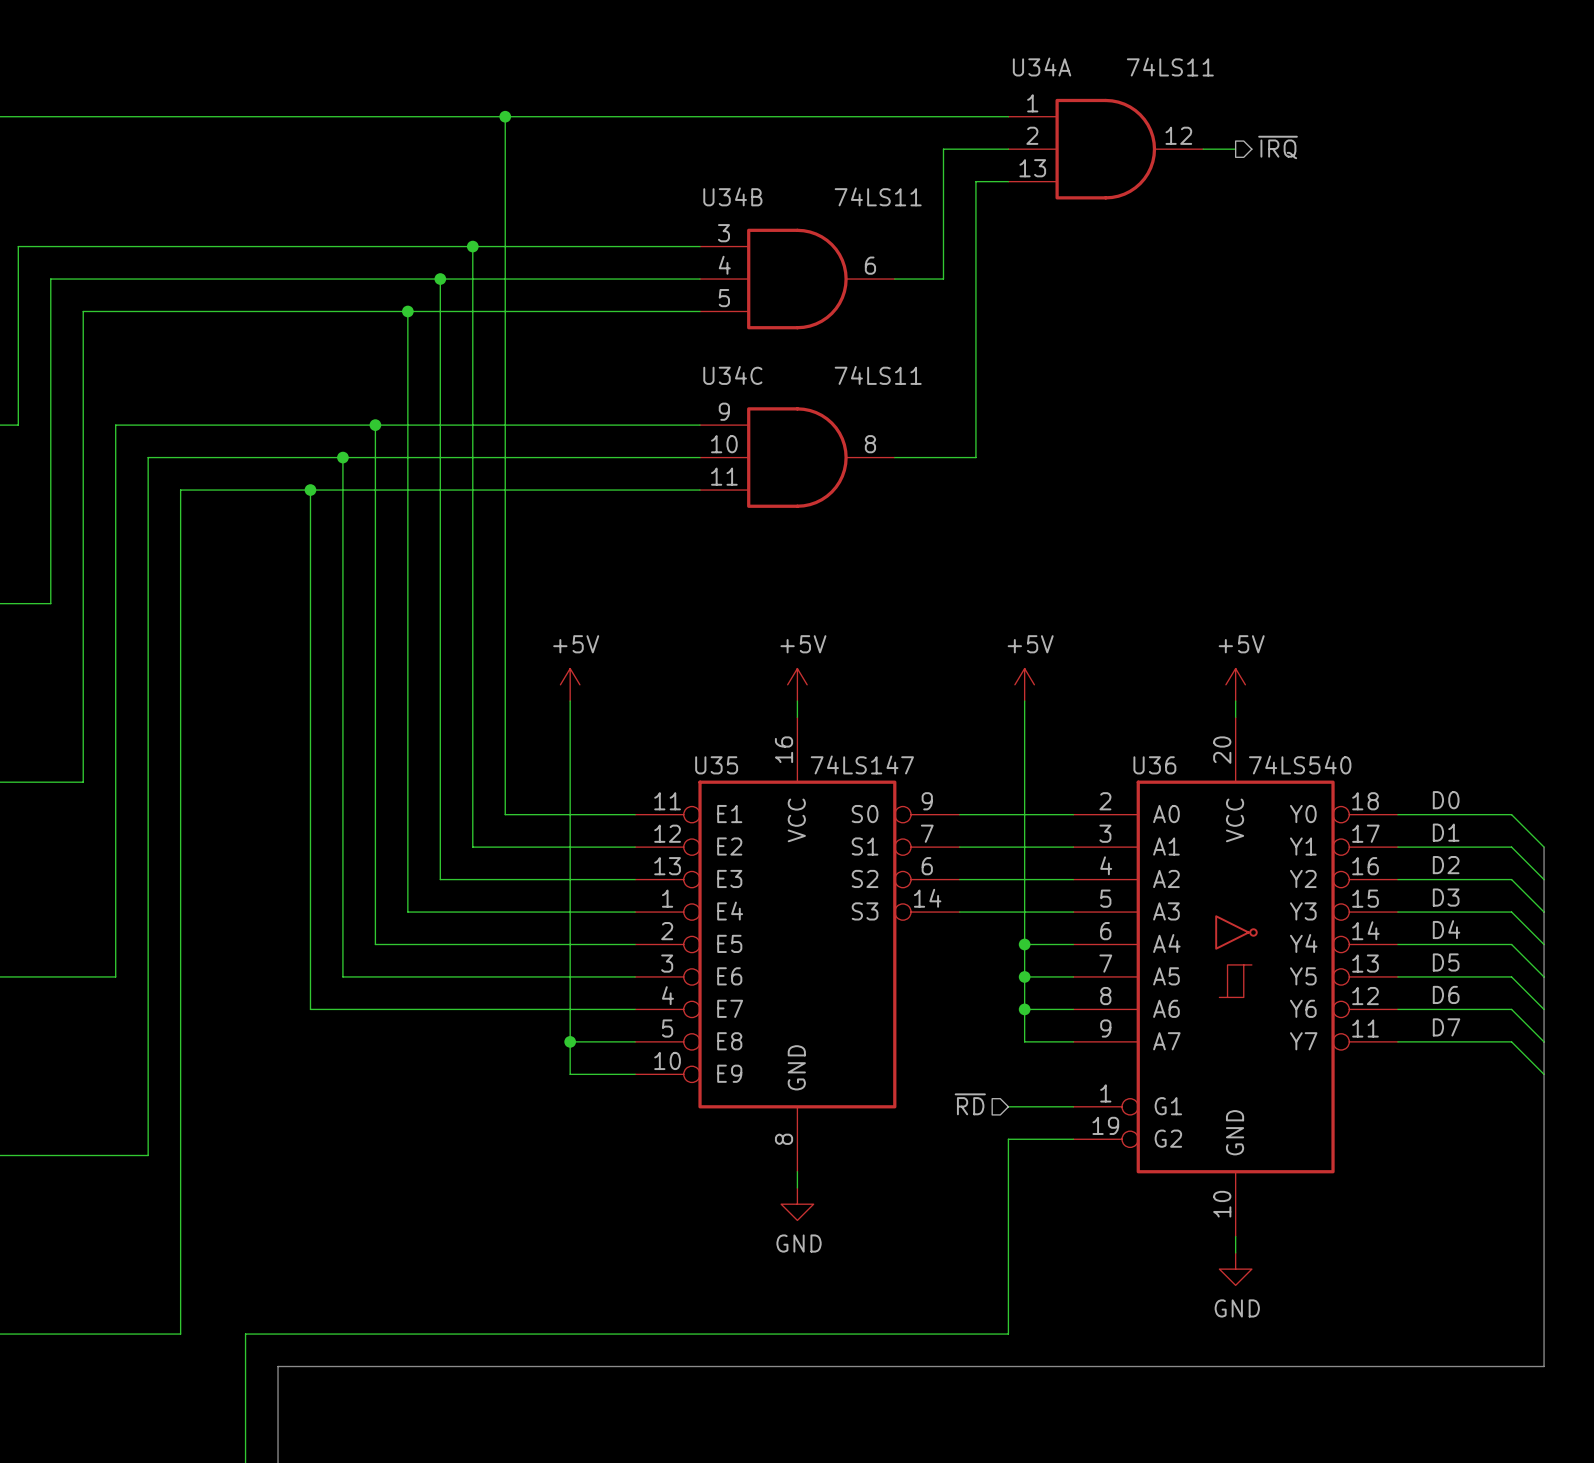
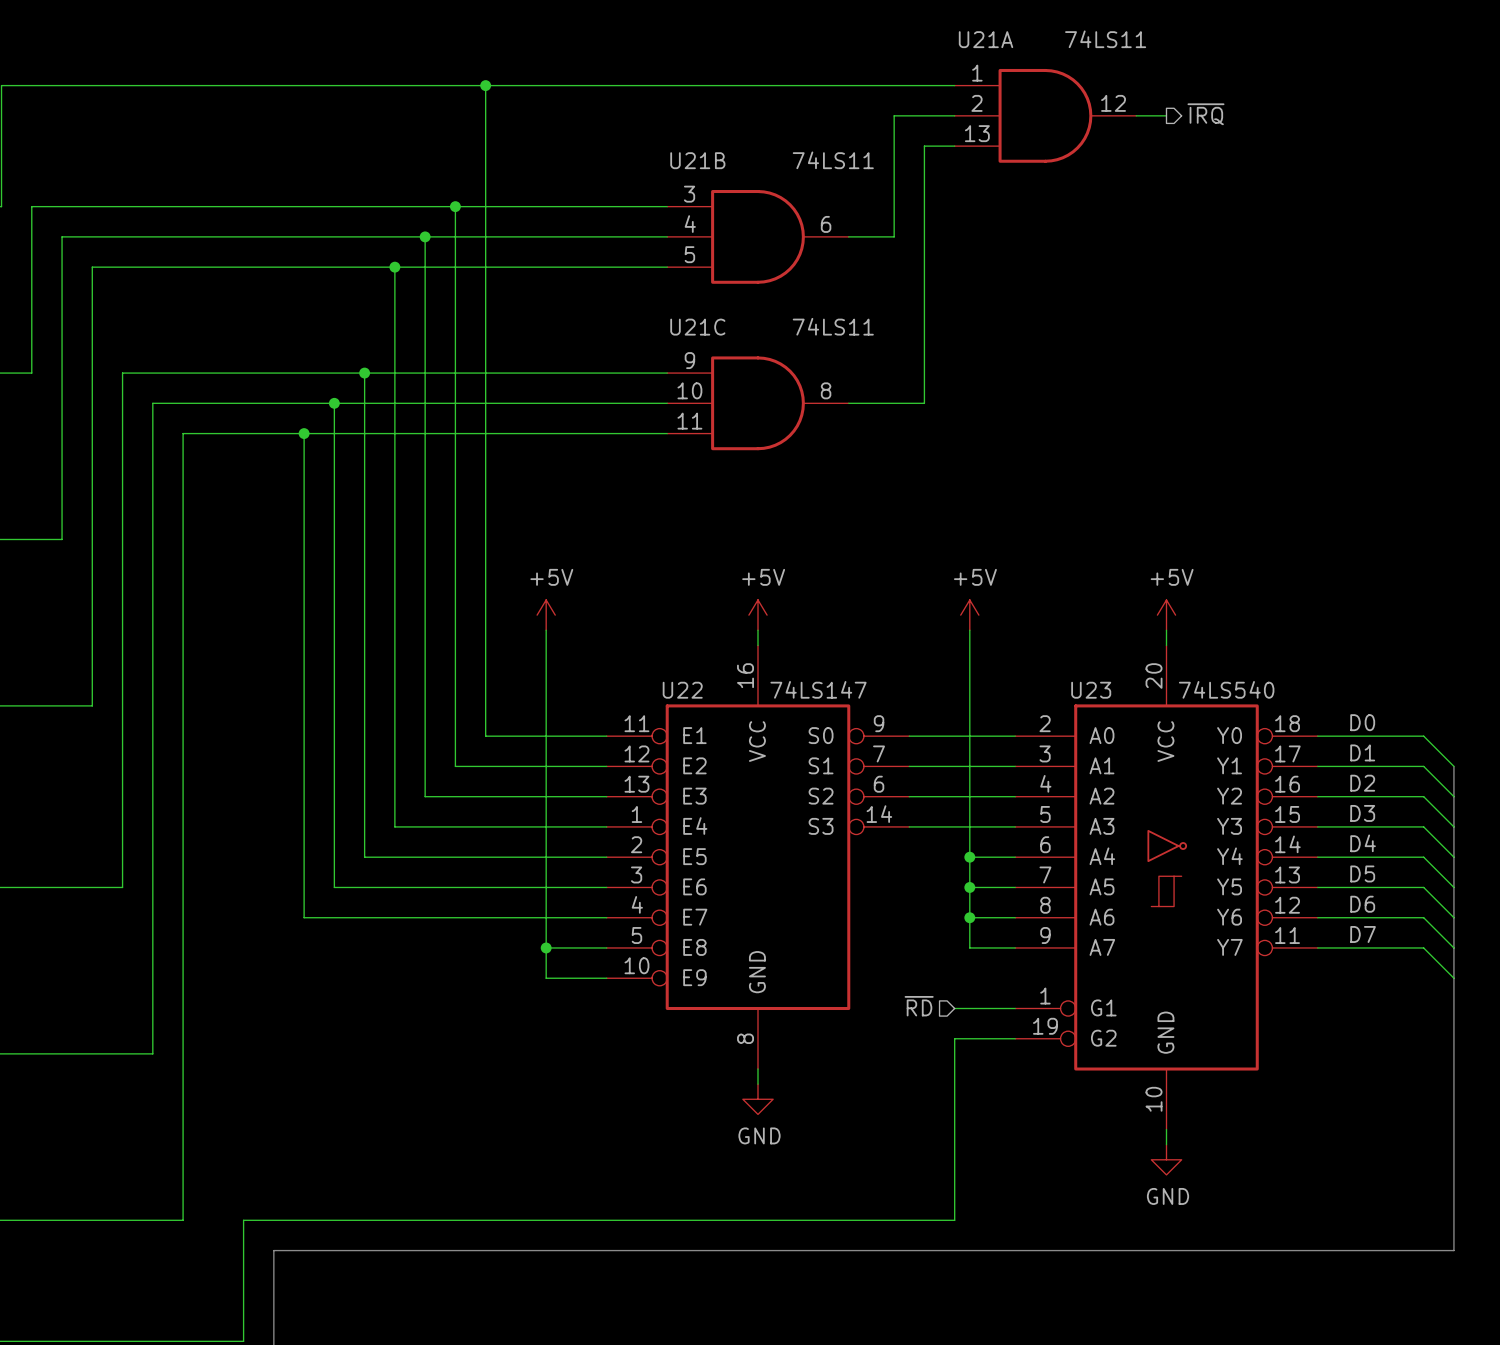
U34A name: U34A (1042, 67) -> U21A (986, 39)
U34B name: U34B (732, 196) -> U21B (697, 160)
U34C name: U34C (732, 375) -> U21C (697, 327)
U35 name: U35 (716, 765) -> U22 (682, 690)
U36 name: U36 (1154, 765) -> U23 (1091, 690)

